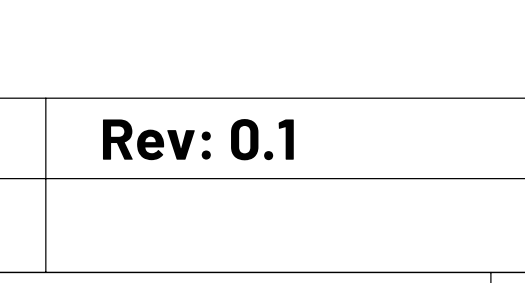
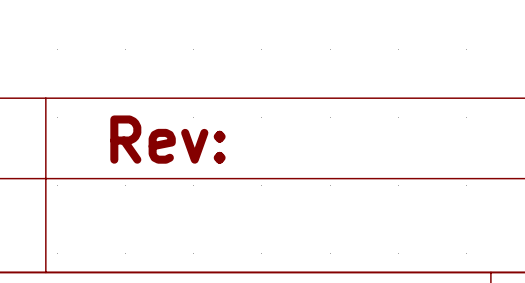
title block: Rev: 0.1 (198, 139) -> Rev: (167, 139)

